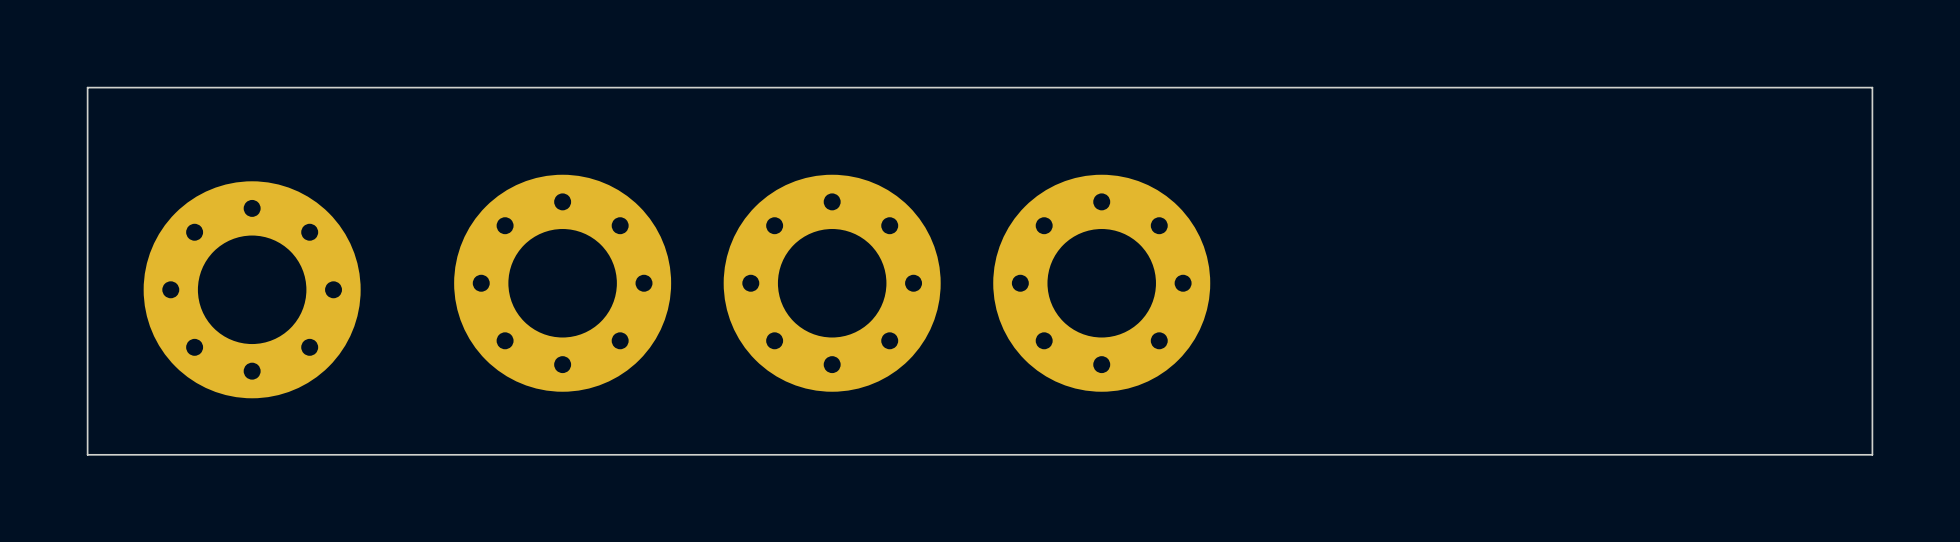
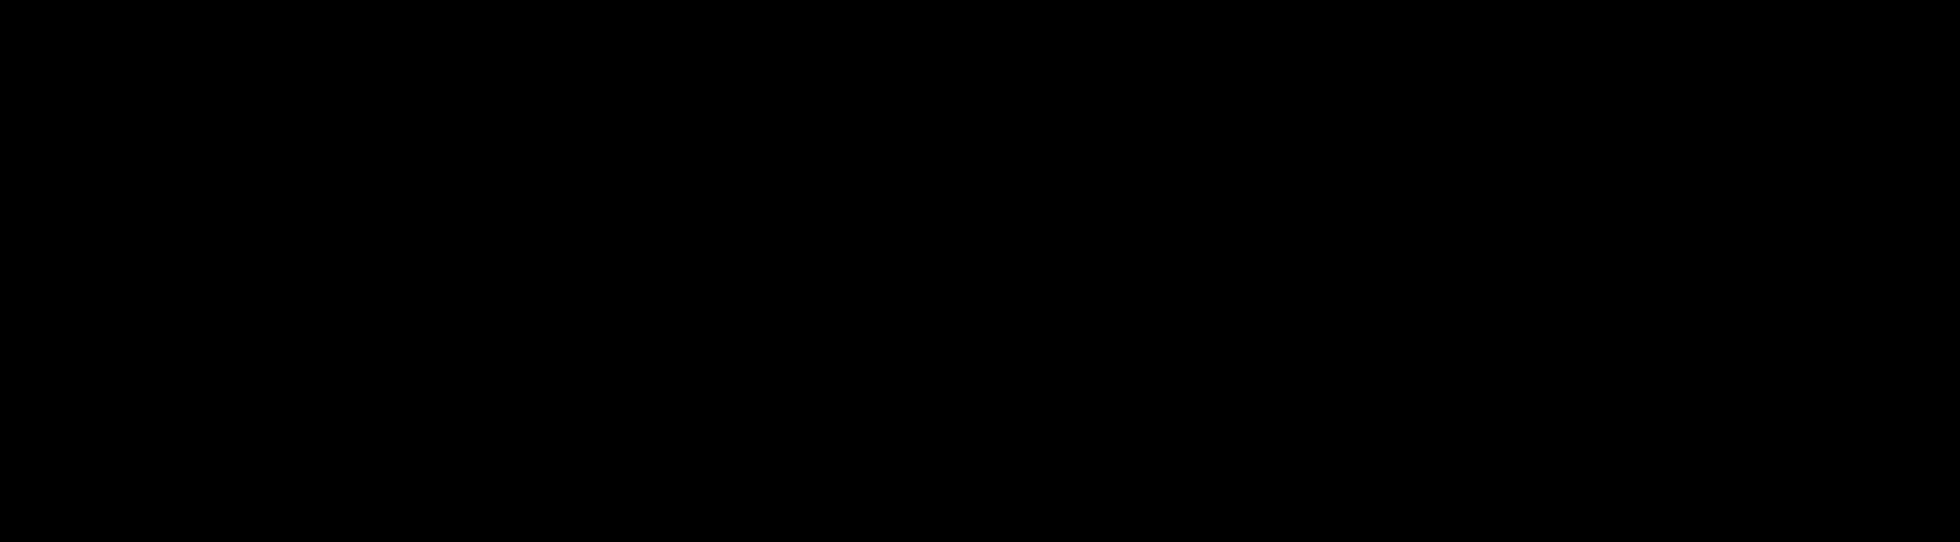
board edge: (1872, 87) (87, 87) (87, 454) (1872, 454) (1872, 87) -> none
part: (562, 283) -> none
part: (832, 283) -> none
part: (1101, 283) -> none
part: (252, 289) -> none

